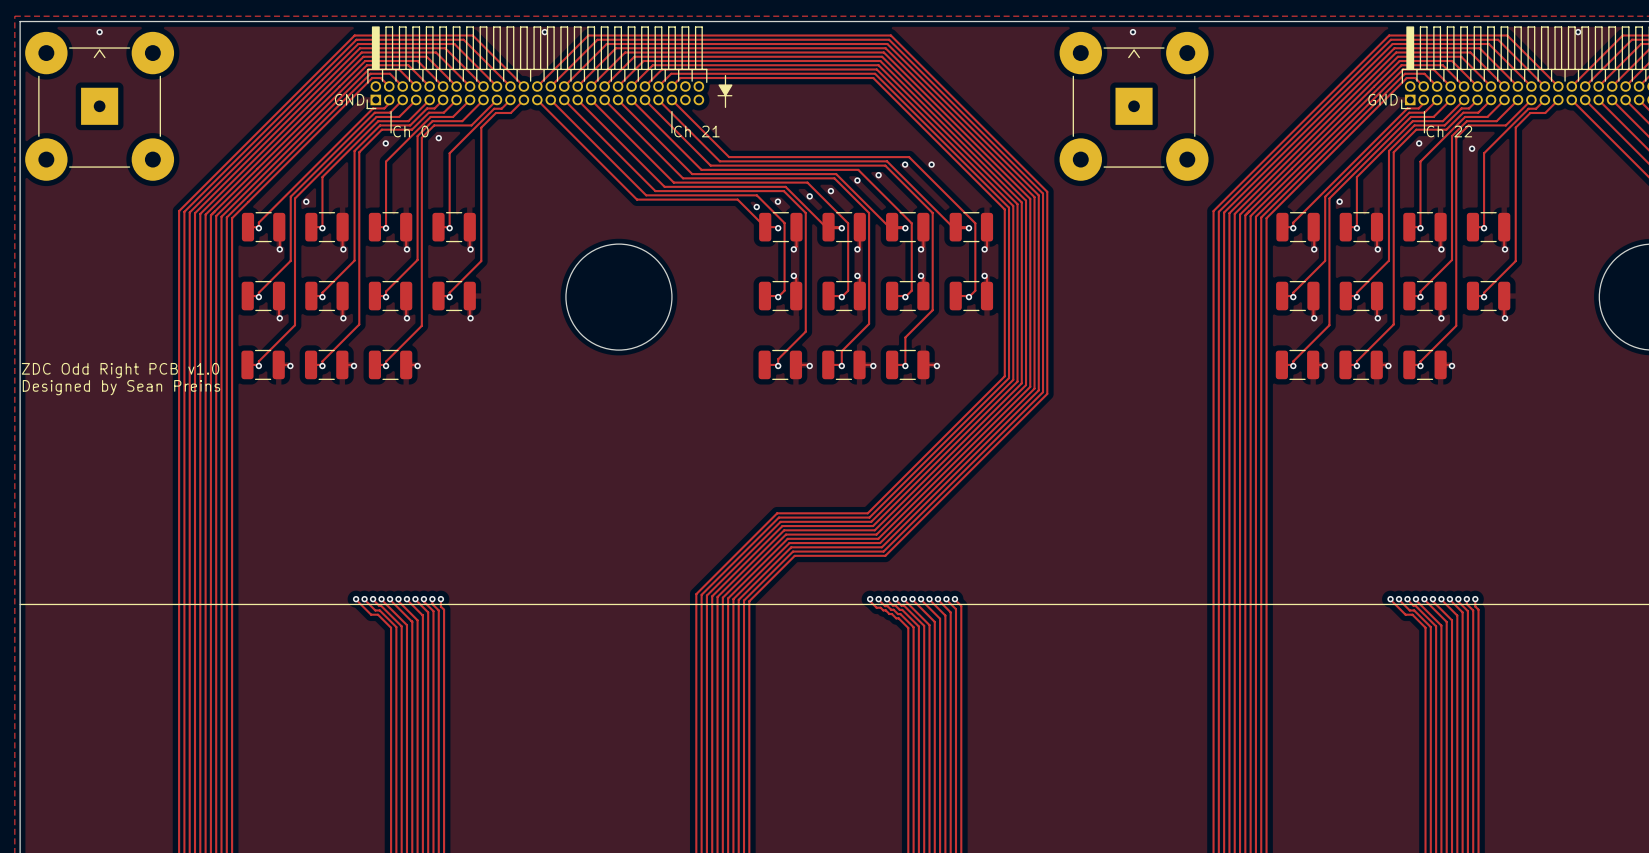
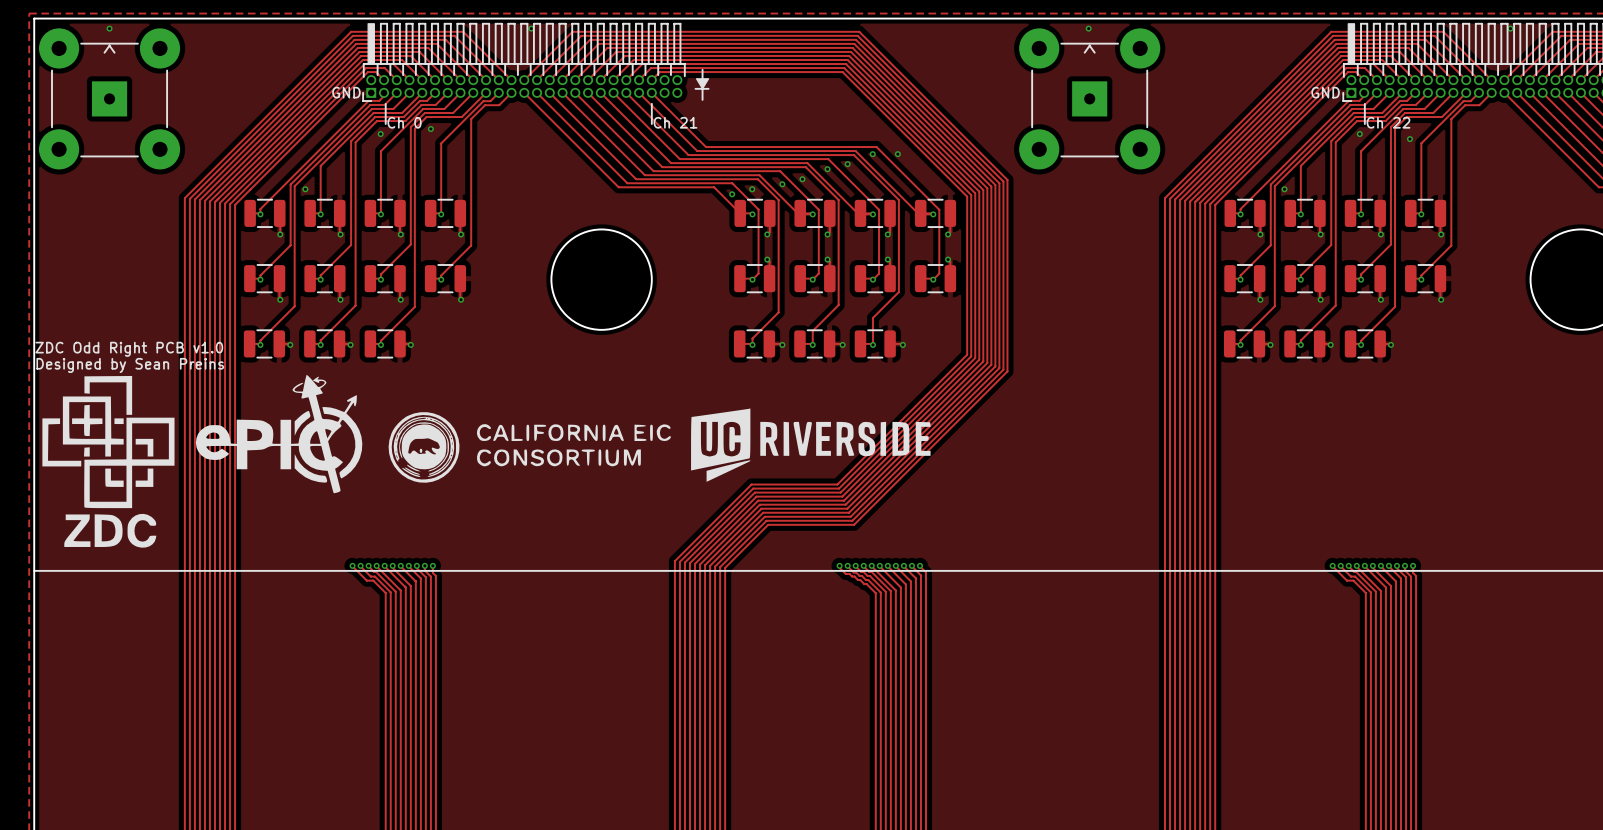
drawing: none -> [42, 374, 931, 548]

